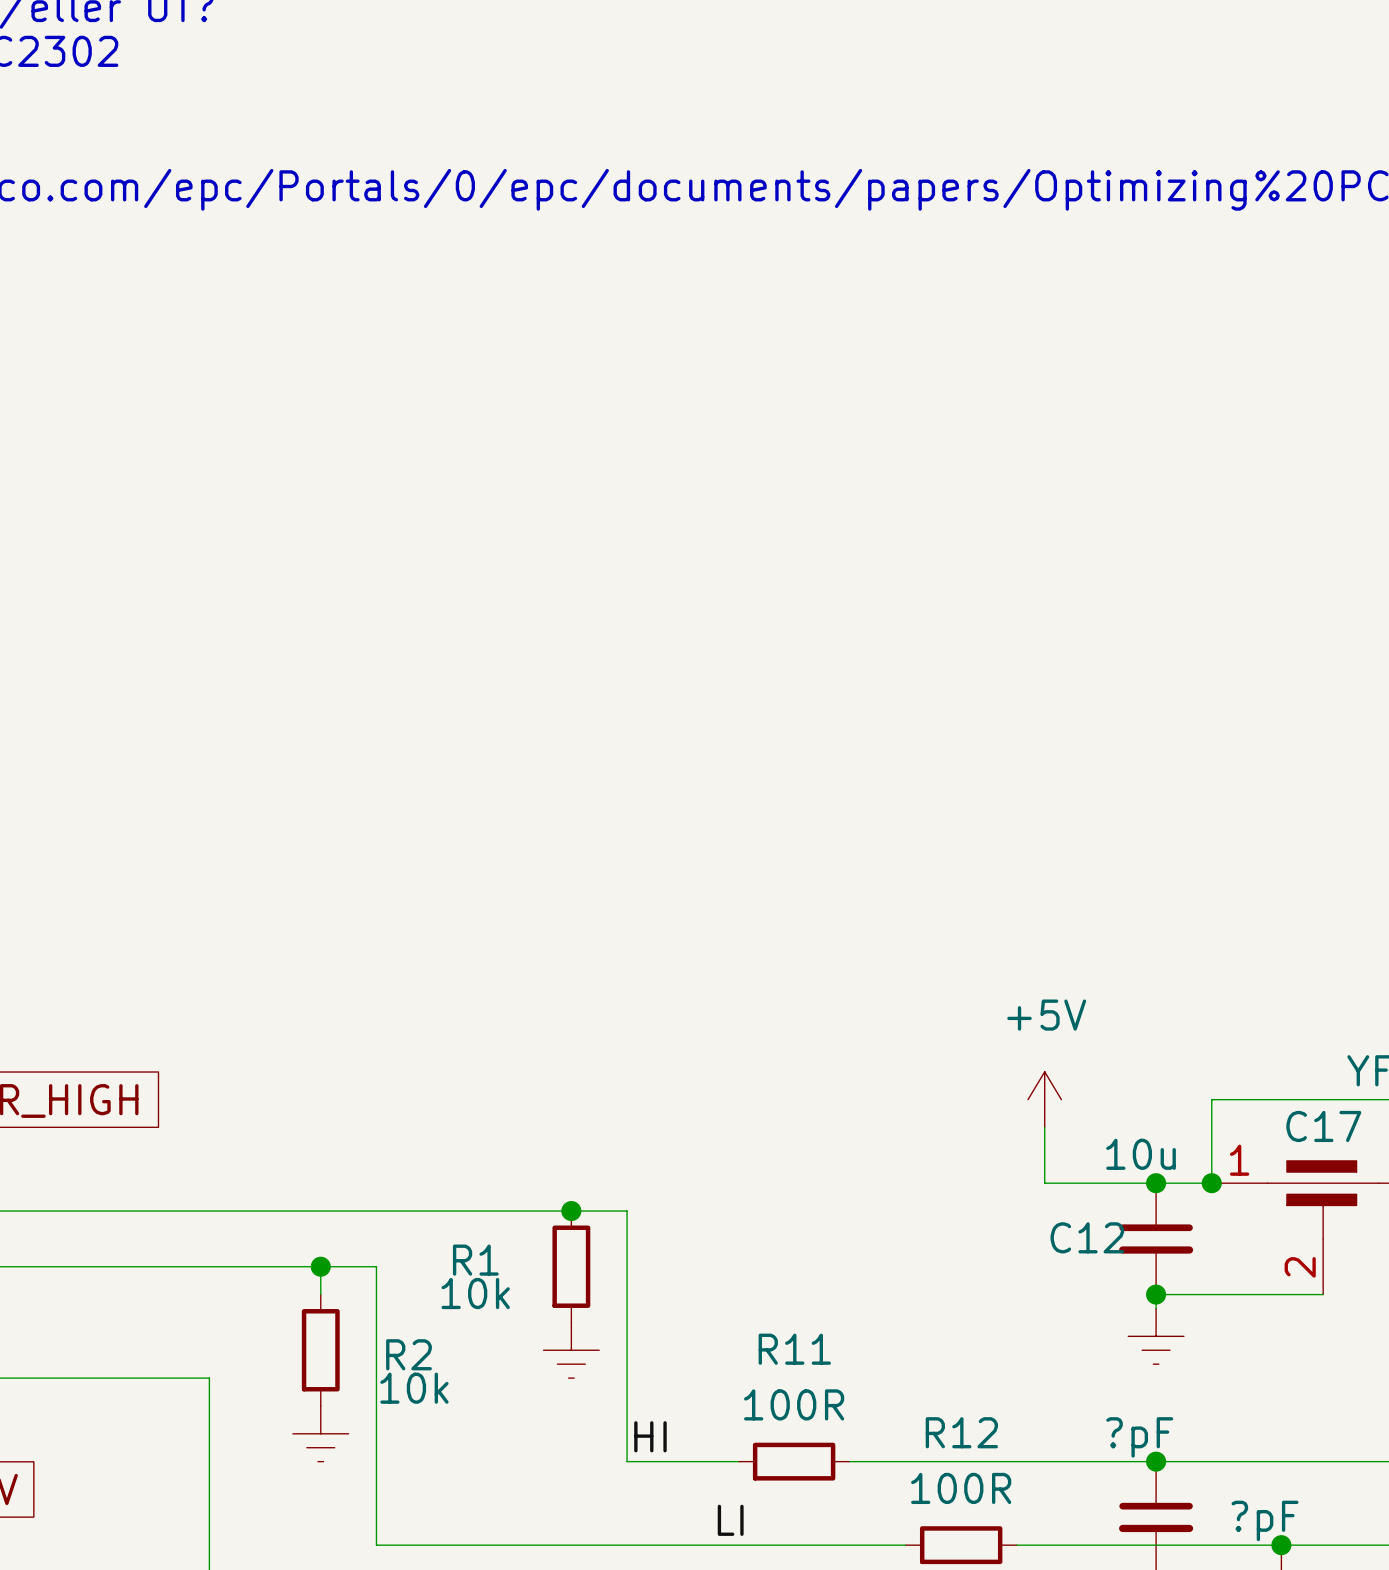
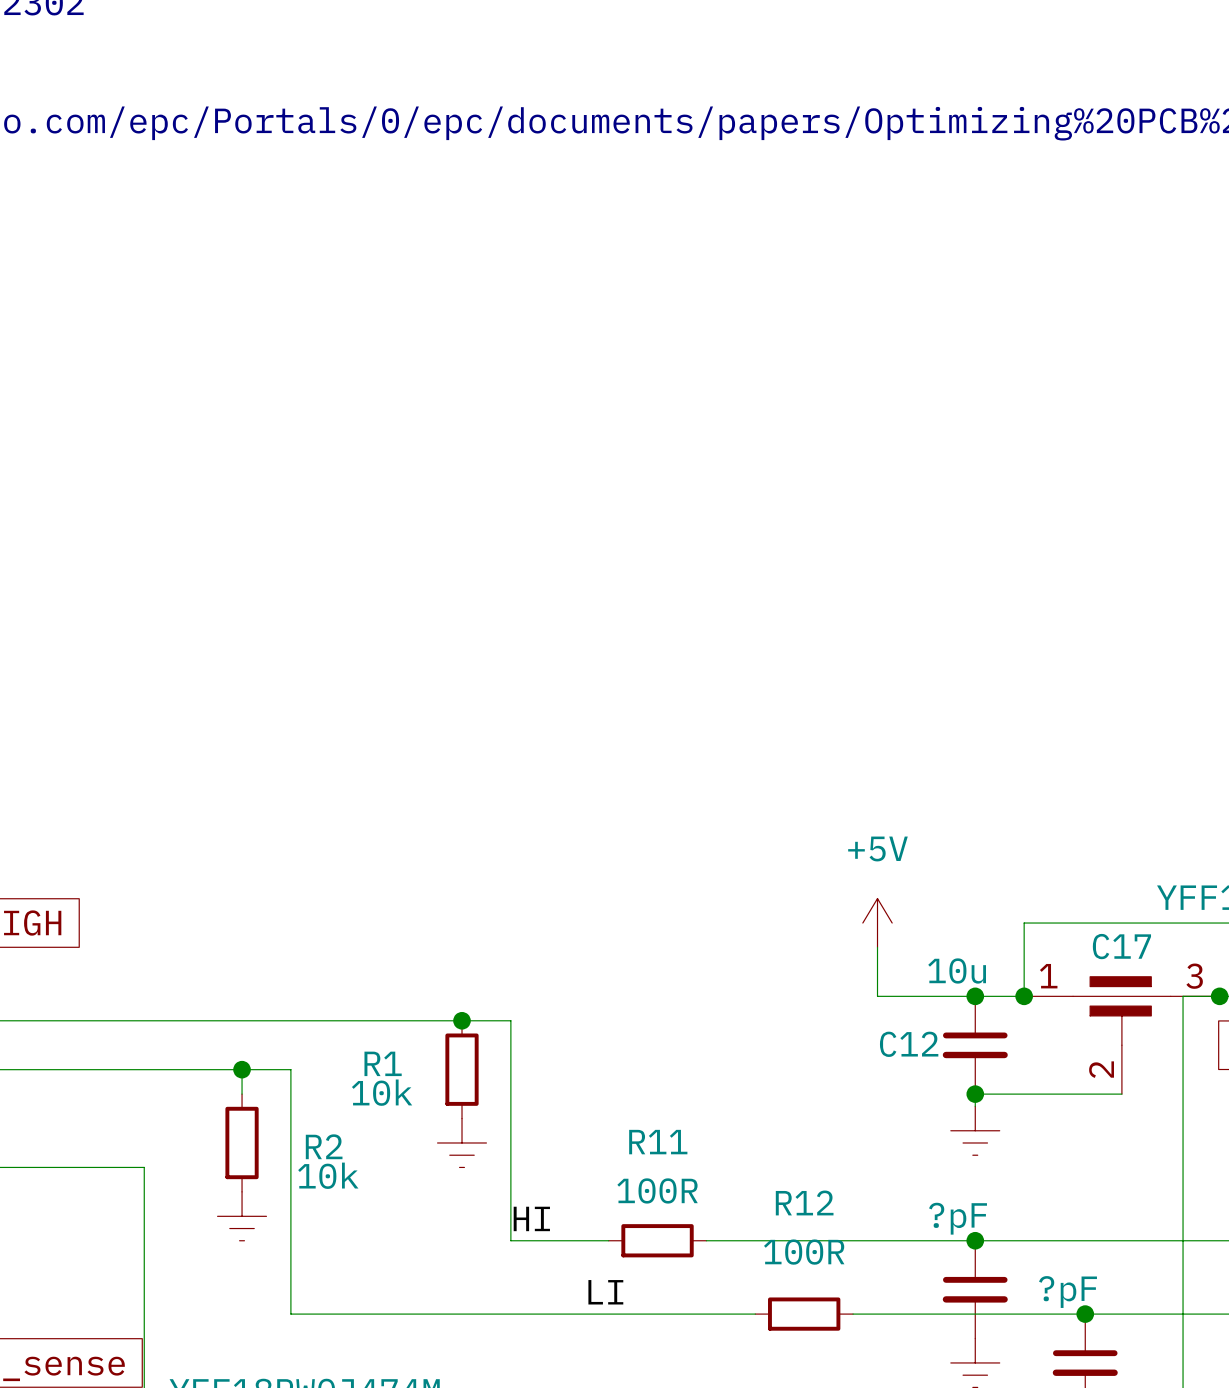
R12 name position: R12 (961, 1432) -> R12 (804, 1202)
R12 value position: 100R (961, 1488) -> 100R (804, 1252)

